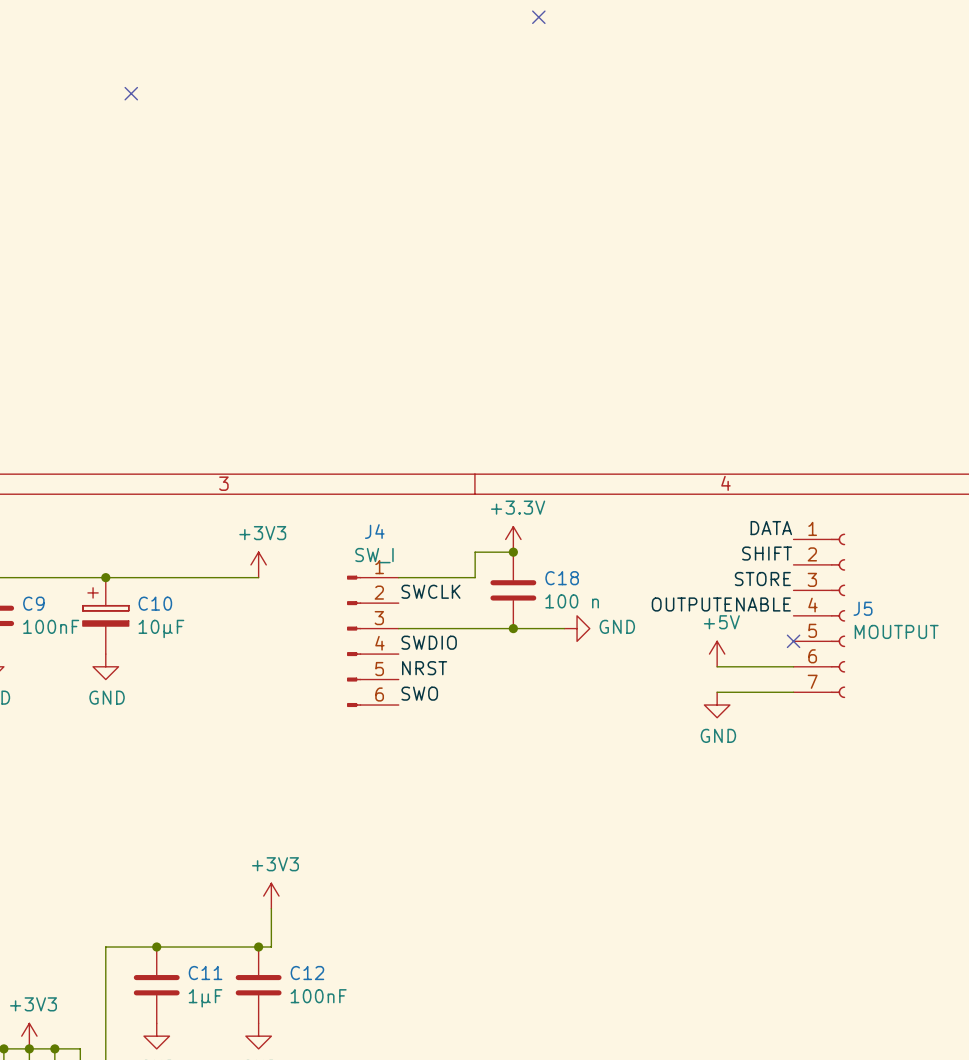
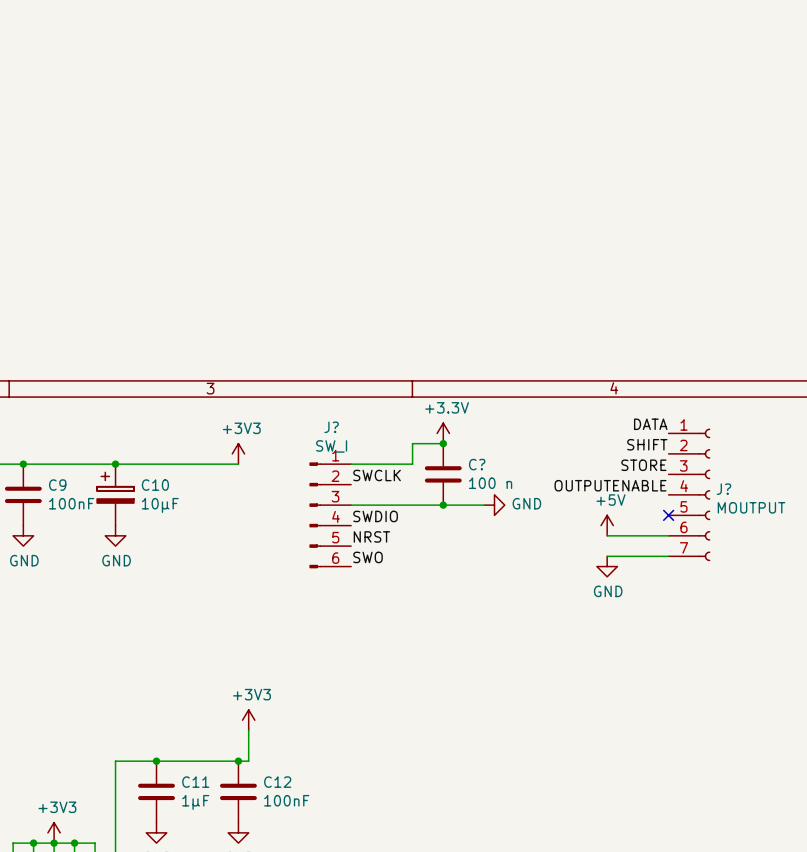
no-connect mark: (538, 17) -> none
no-connect mark: (131, 93) -> none
J4 name: J4 (374, 531) -> J? (331, 427)
C18 name: C18 (562, 578) -> C? (477, 464)
J5 name: J5 (862, 608) -> J? (723, 489)

